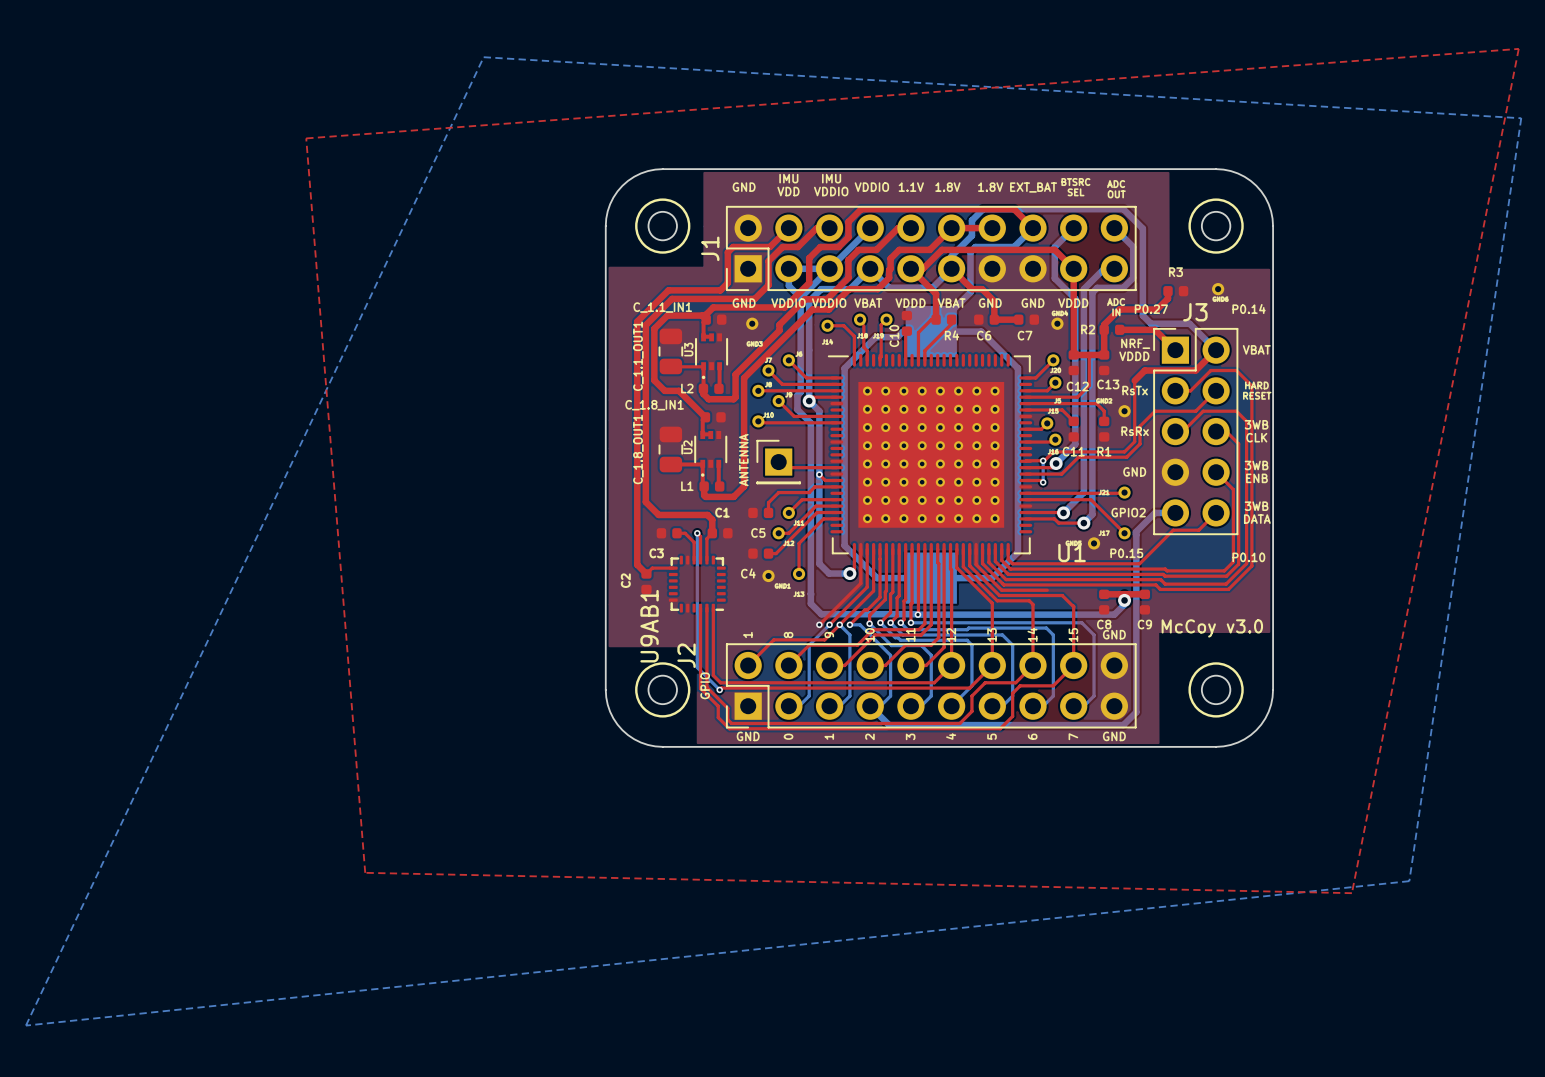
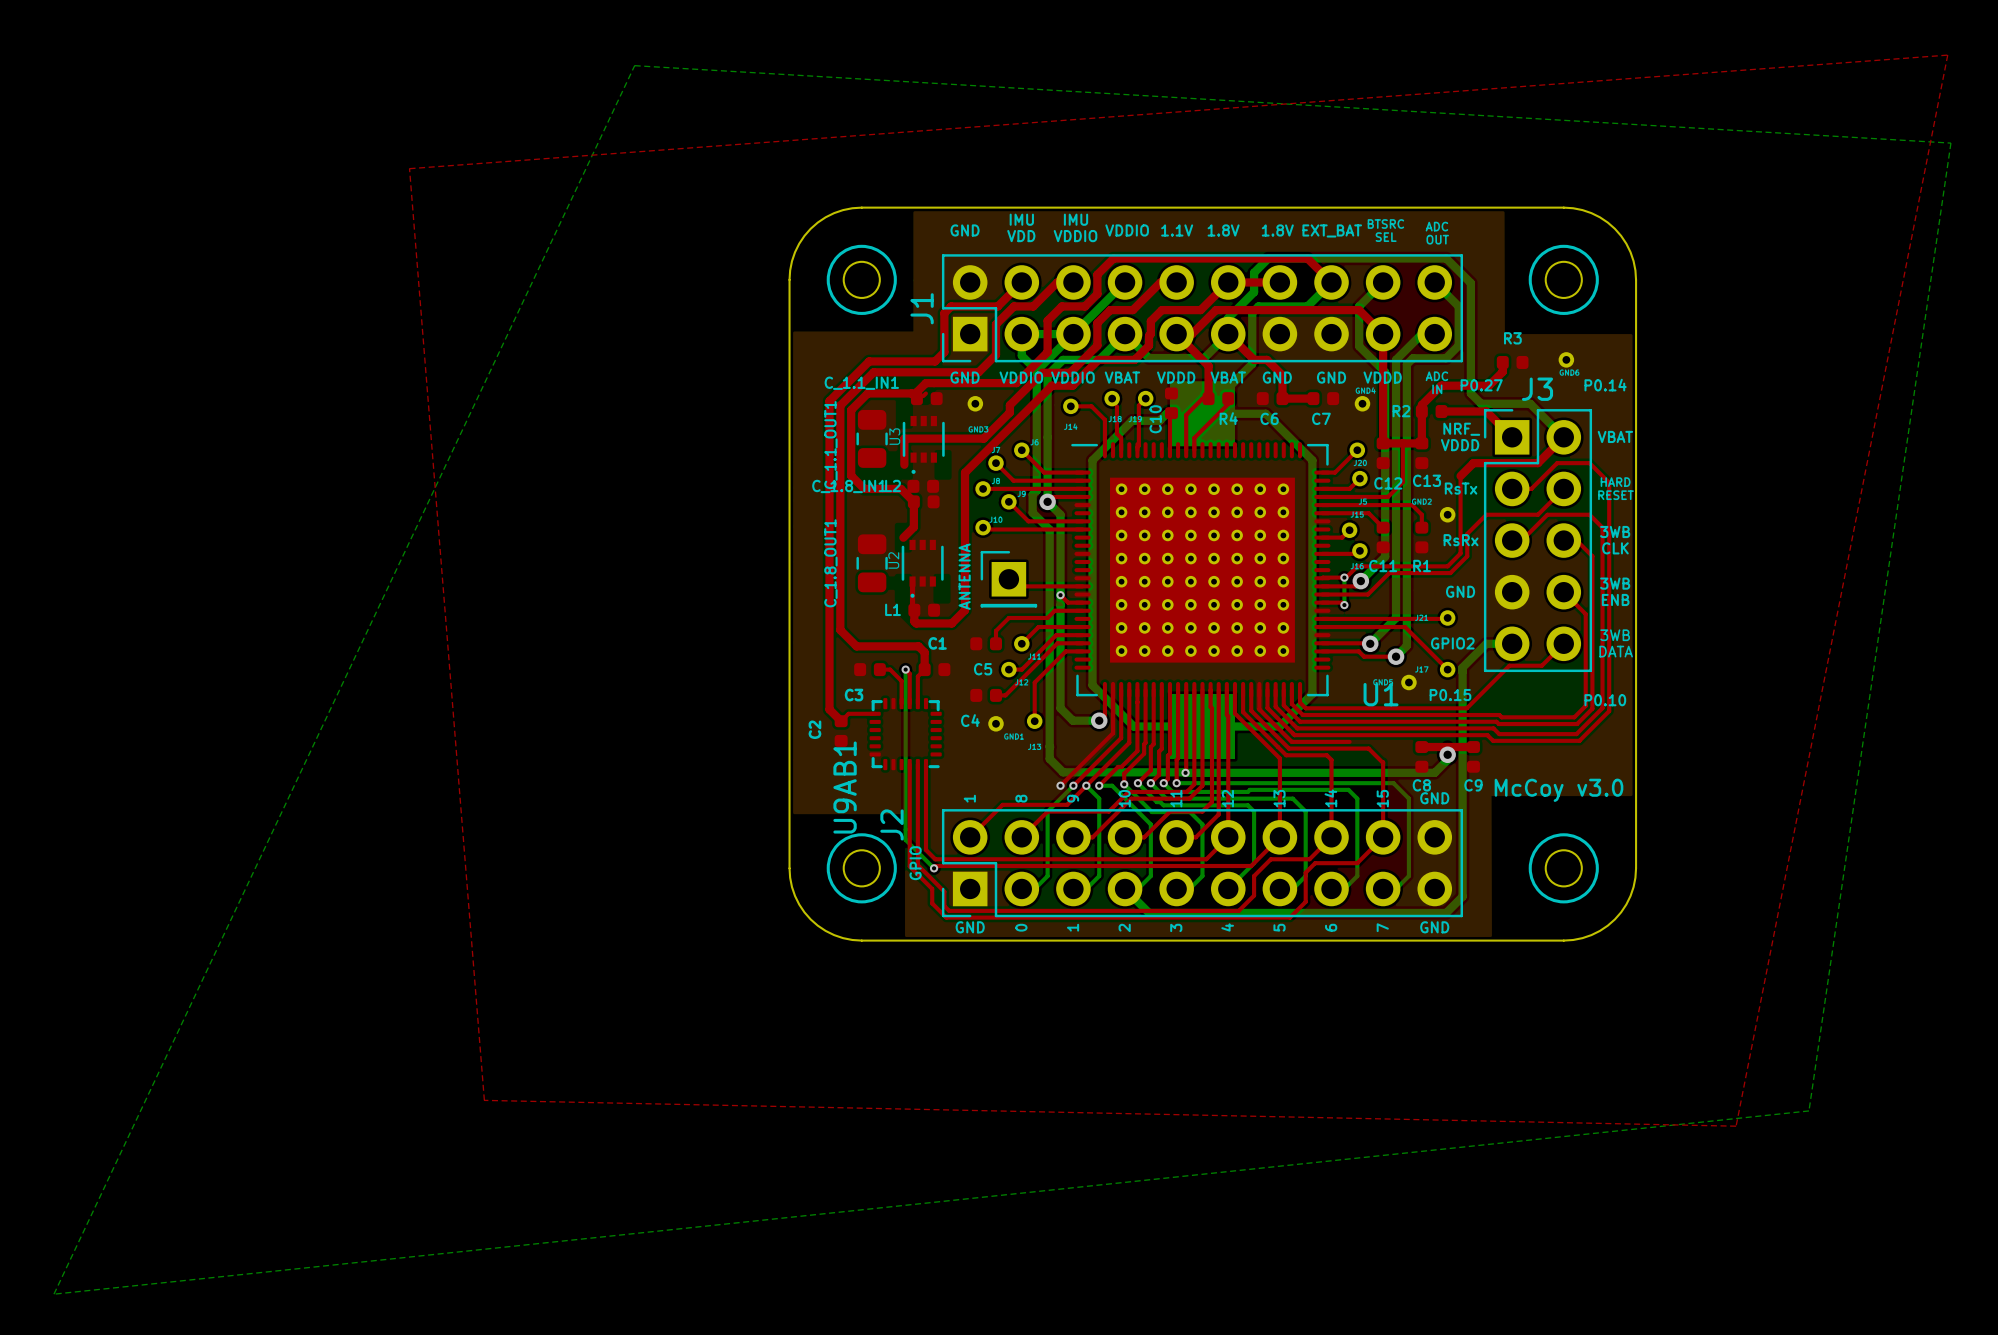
top track: none -> (925, 393) (923, 396)
top track: (706, 319) (703, 322) (703, 336) (711, 336) -> none
top track: (758, 351) (735, 374) (735, 397) (733, 399) (708, 399) (703, 393) (703, 388) -> (983, 438) (904, 438) (904, 464)
top track: (667, 366) (703, 366) -> none
top track: (703, 366) (703, 385) -> none
top track: (719, 366) (719, 384) -> none
top track: (679, 390) (705, 417) (702, 420) (702, 434) (710, 434) -> (882, 488) (900, 488) (913, 501) (913, 527) (903, 537)
C_1.8_IN1 position: (713, 417) -> (923, 501)
top track: (718, 463) (719, 486) -> none
top track: (666, 464) (702, 464) -> none

